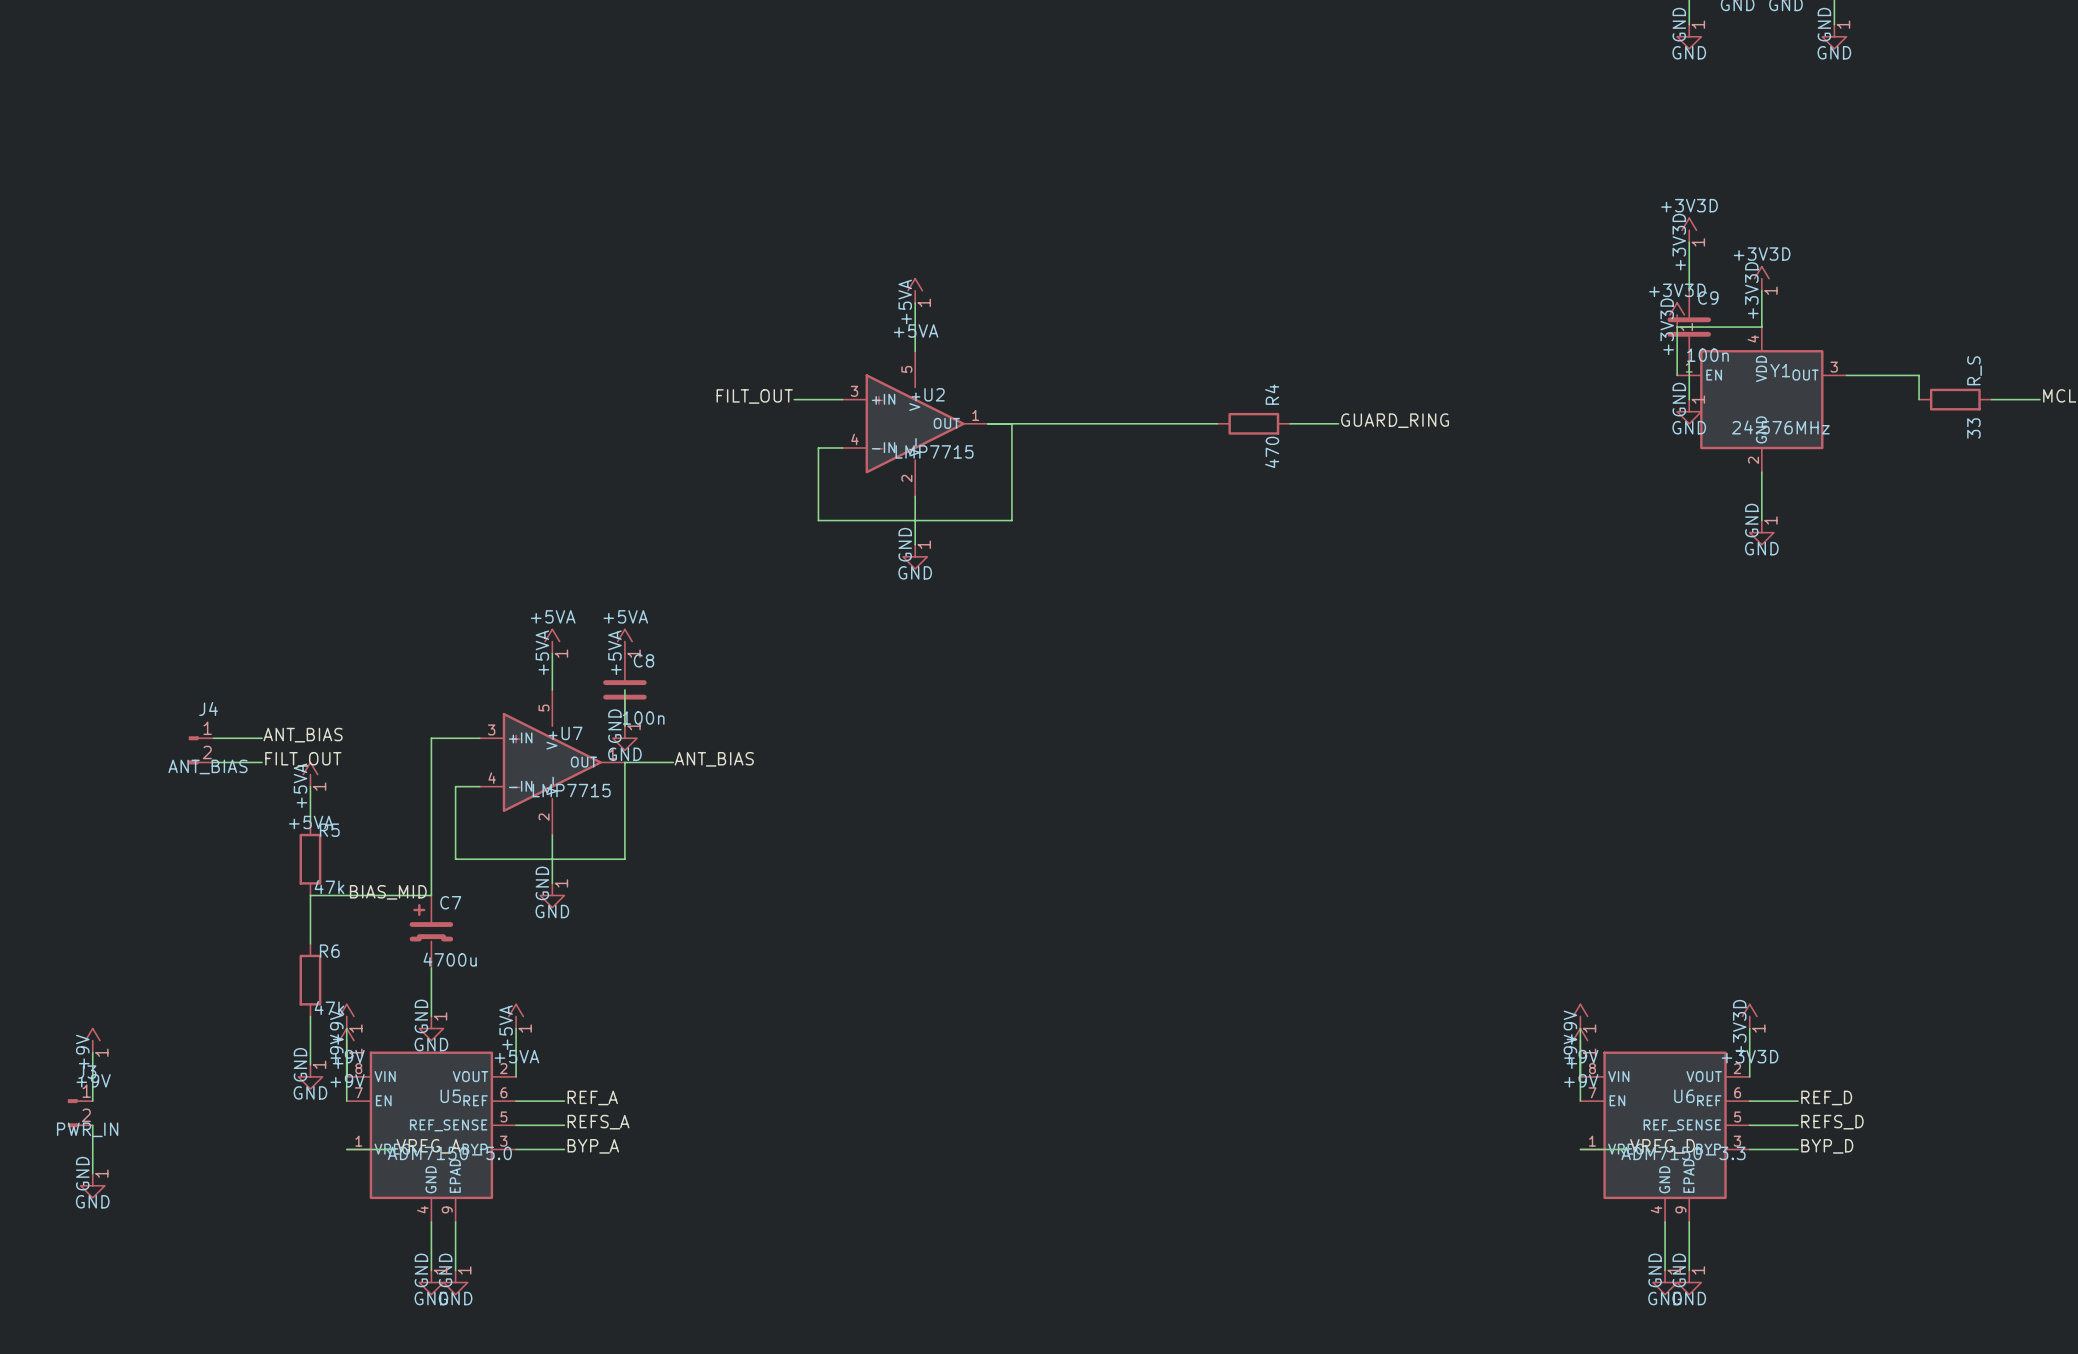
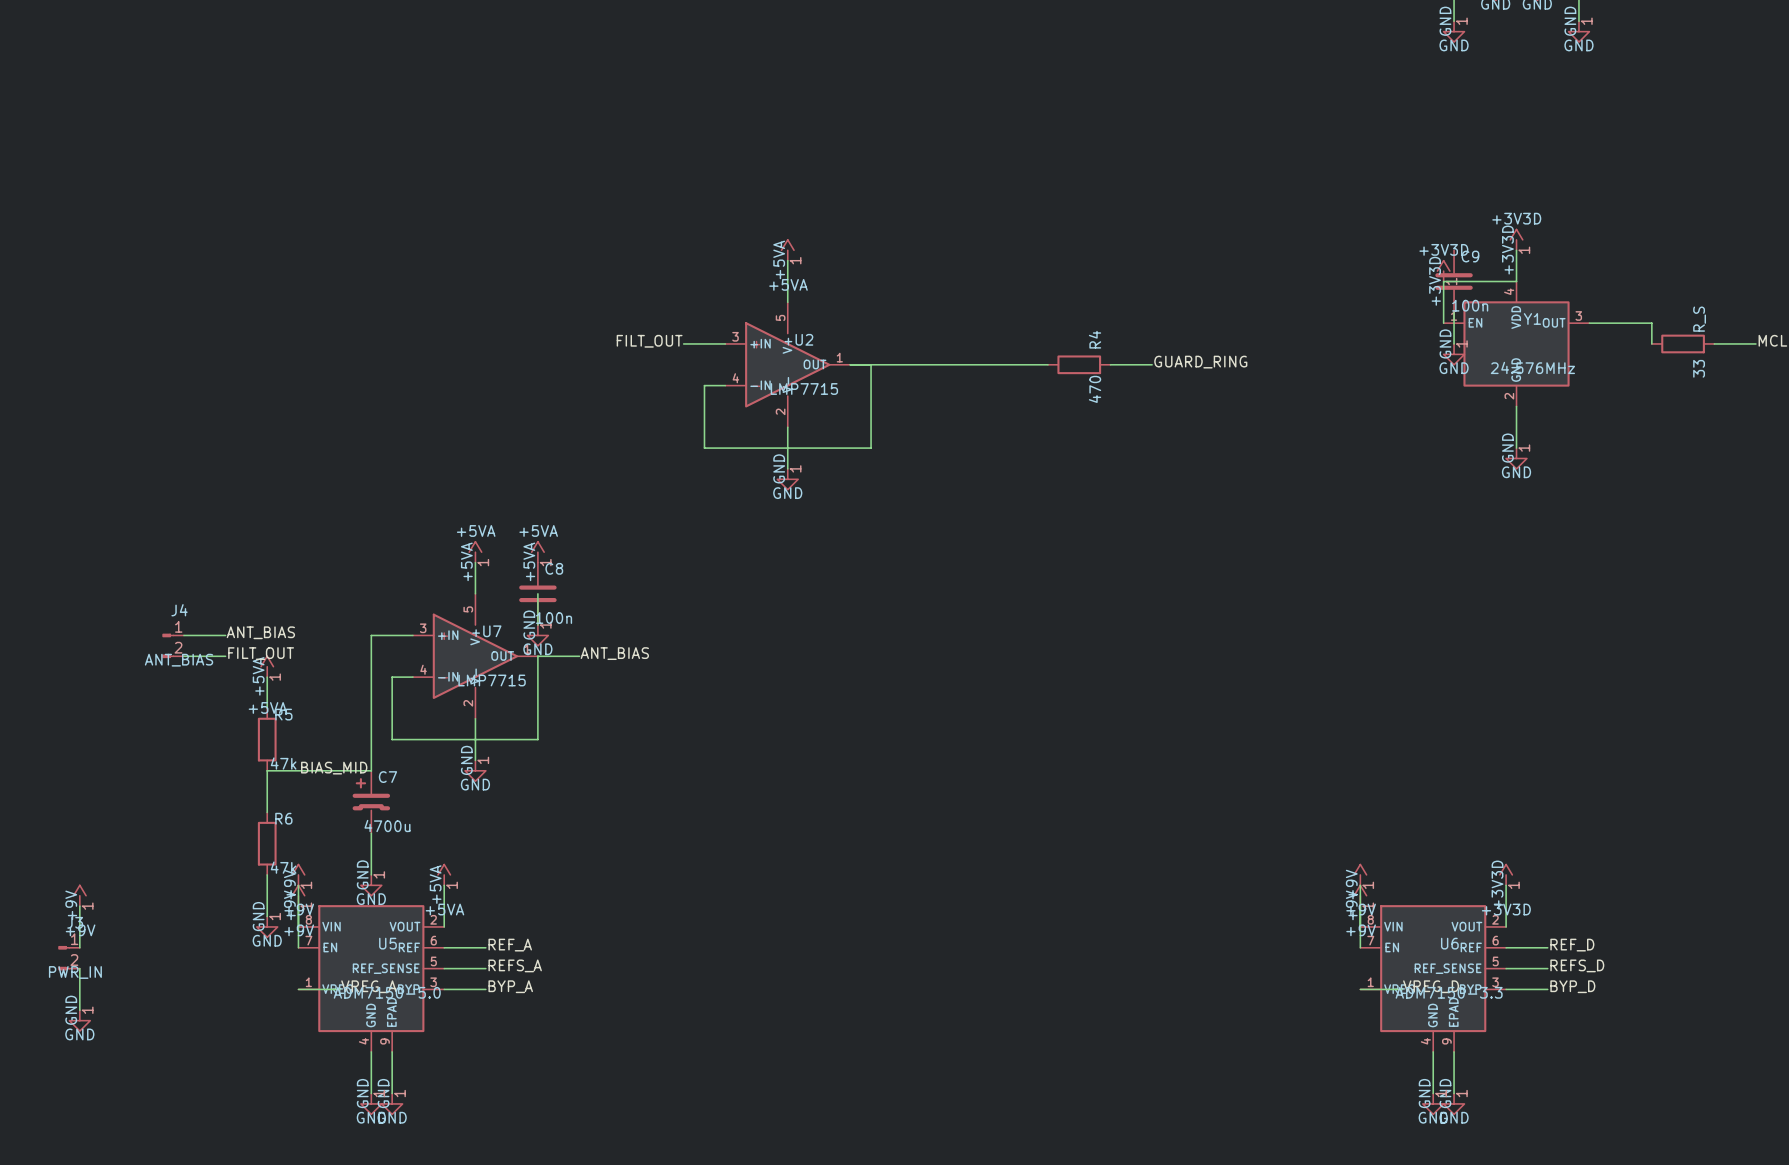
power symbol: +3V3D (1689, 230) -> none
wire: (1689, 242) (1689, 290) -> none

